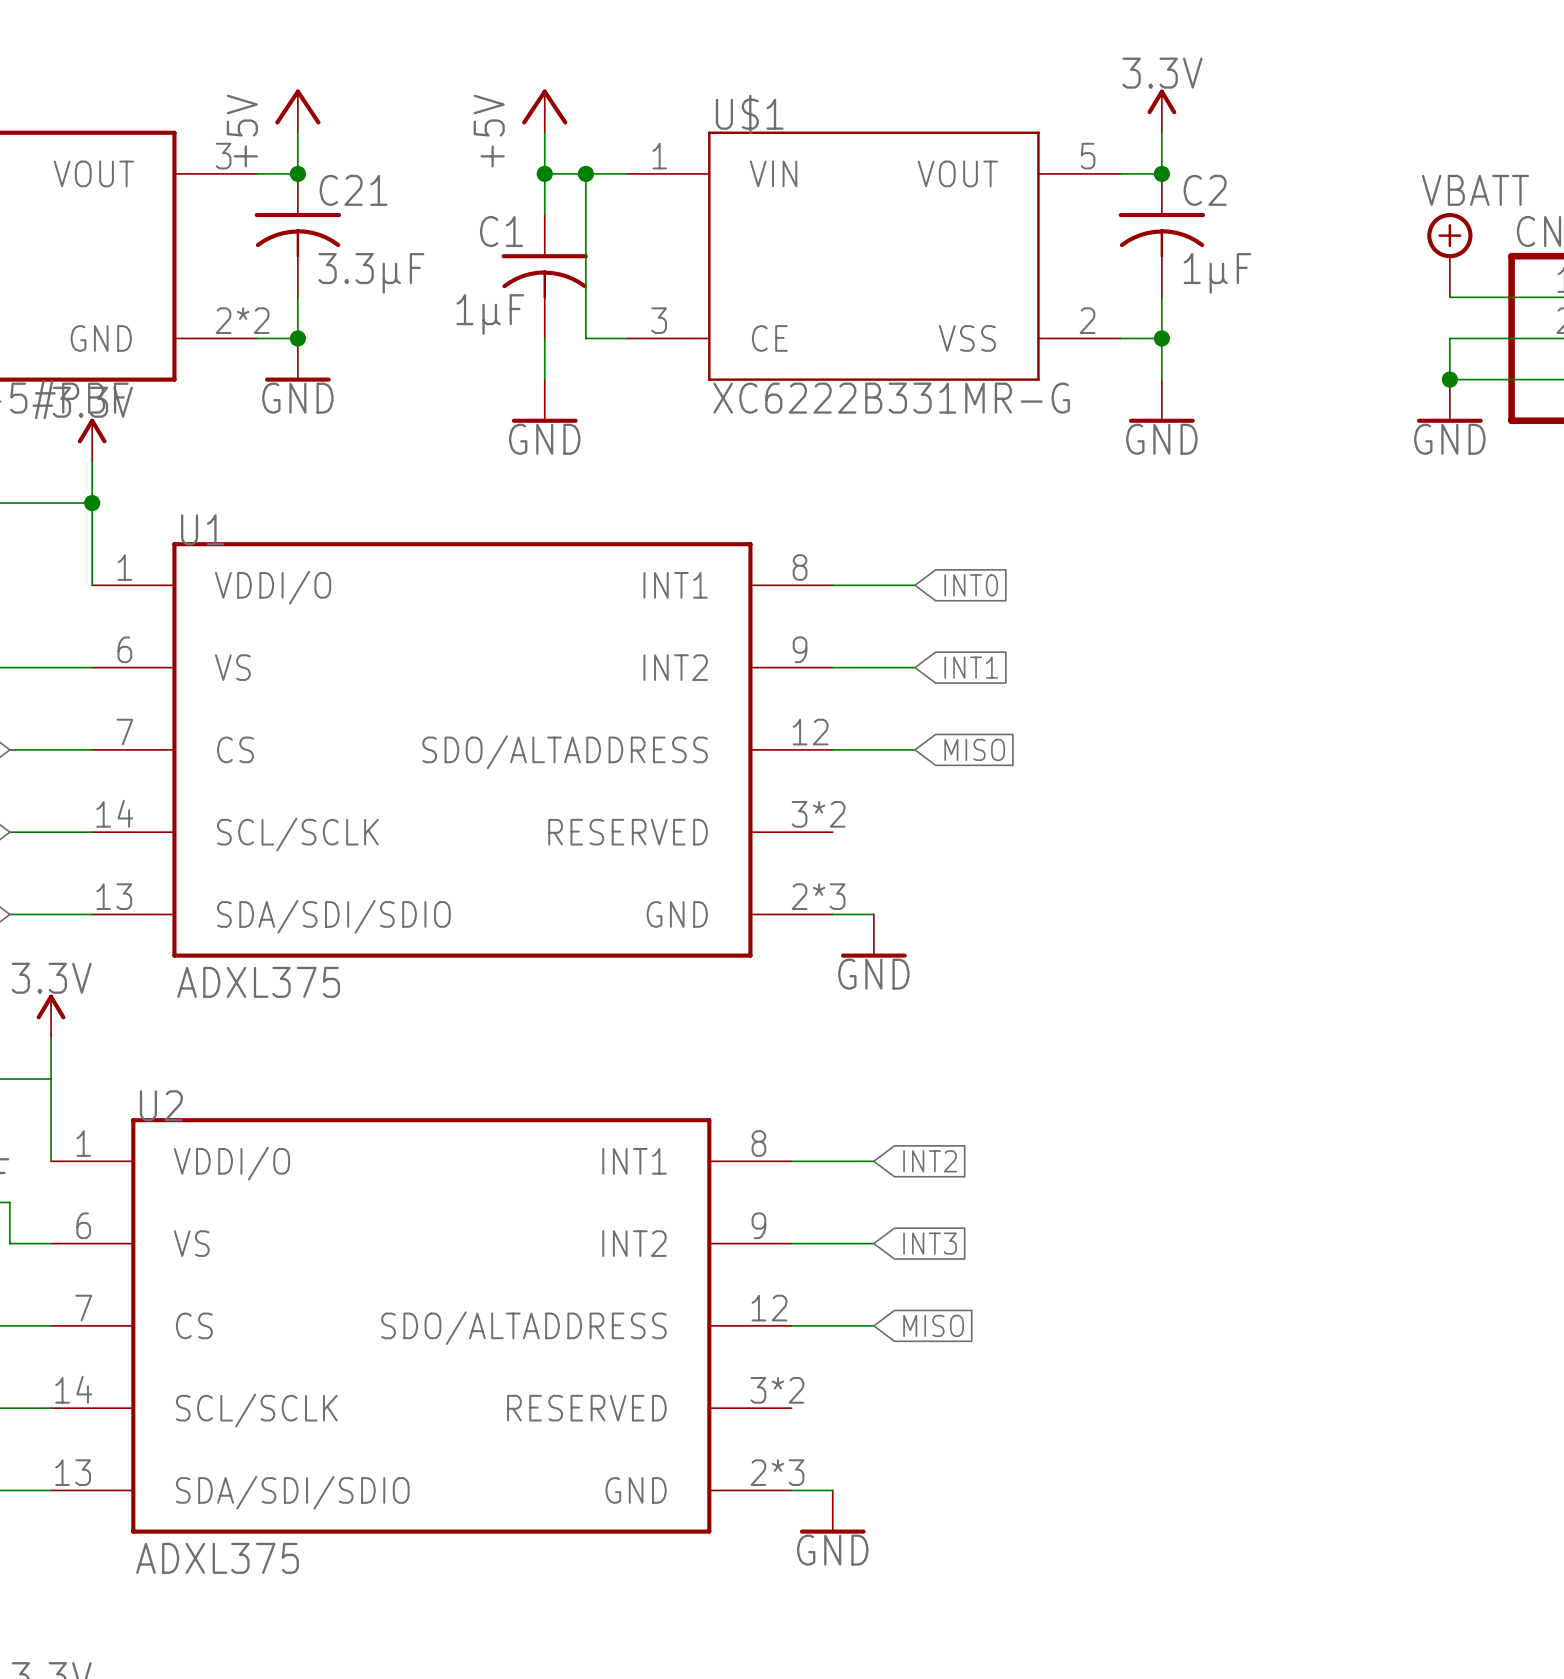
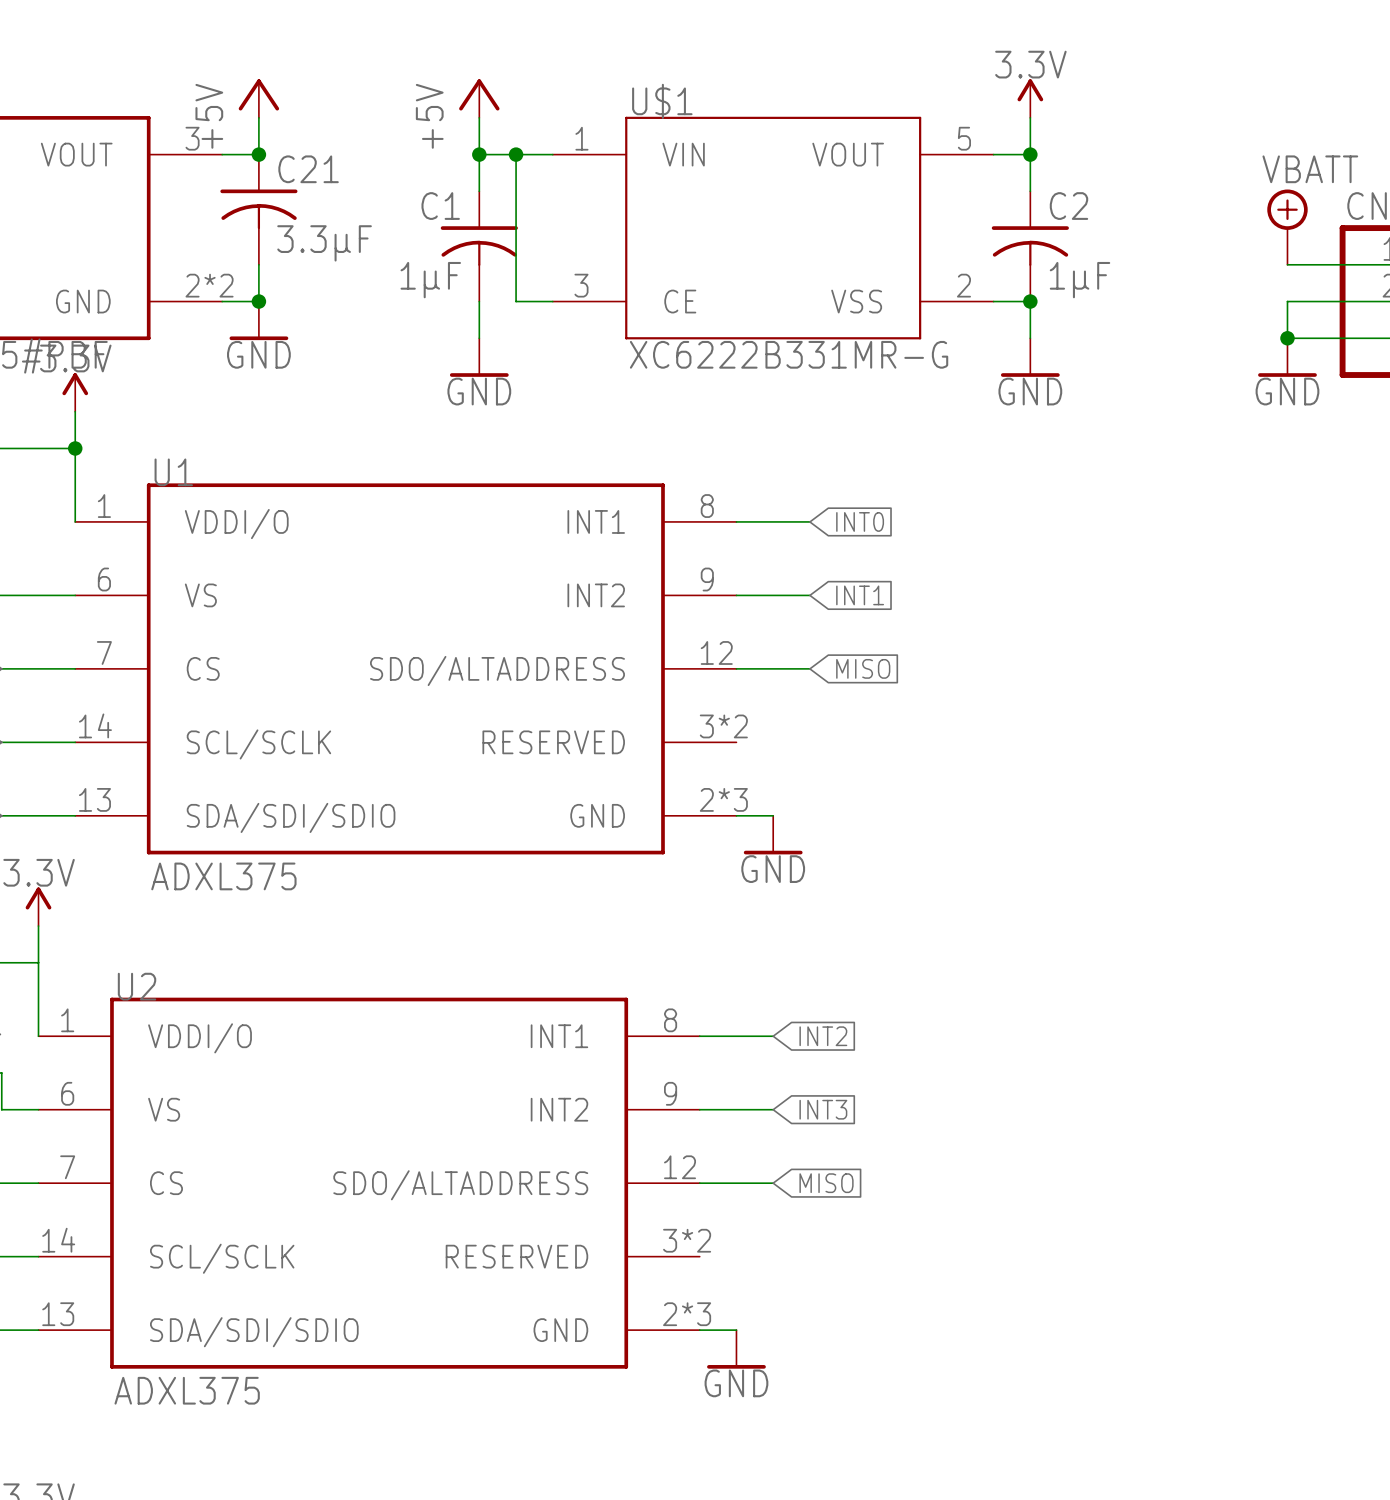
C2 position: (1161, 235) -> (1030, 246)

